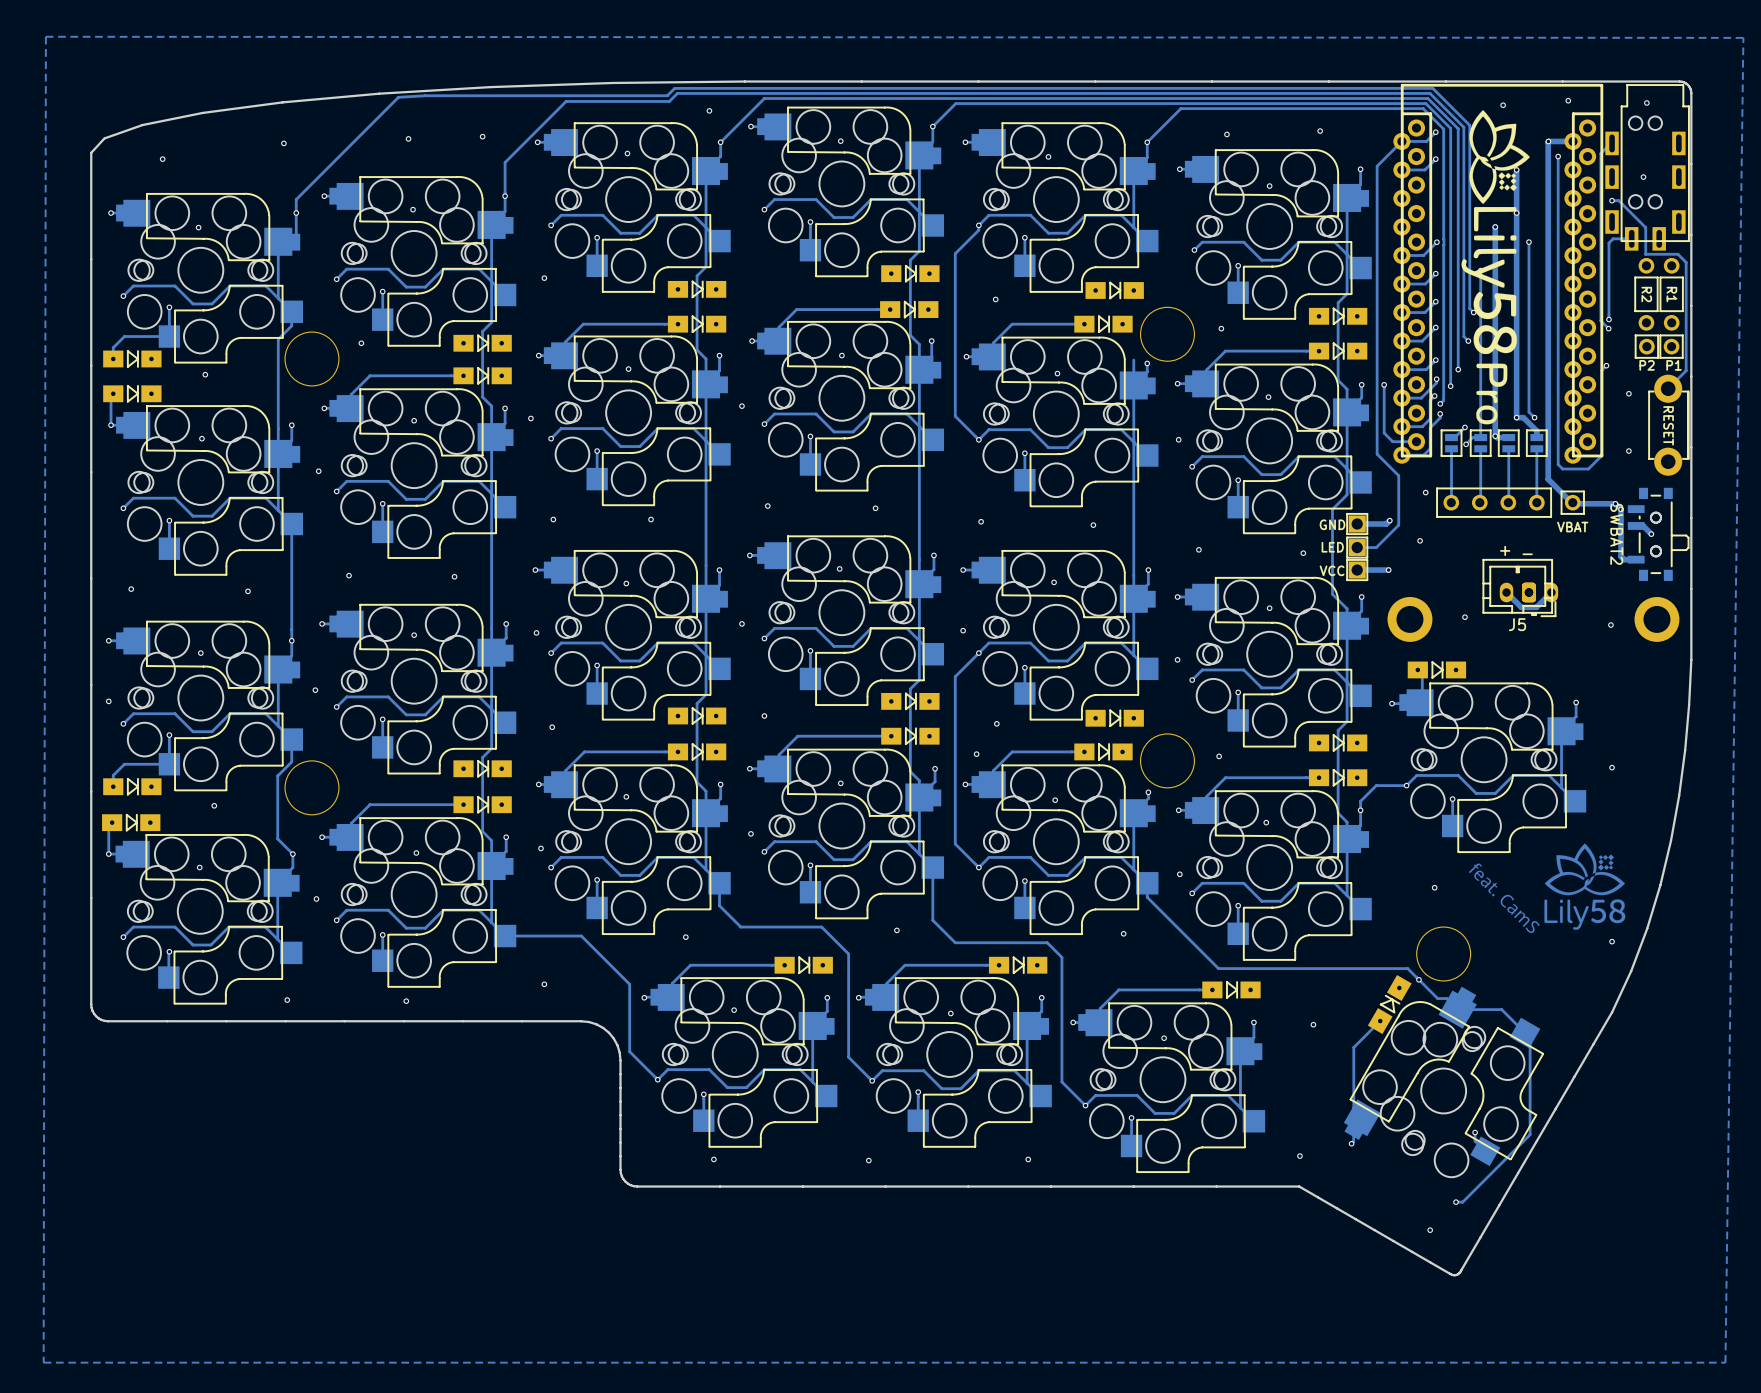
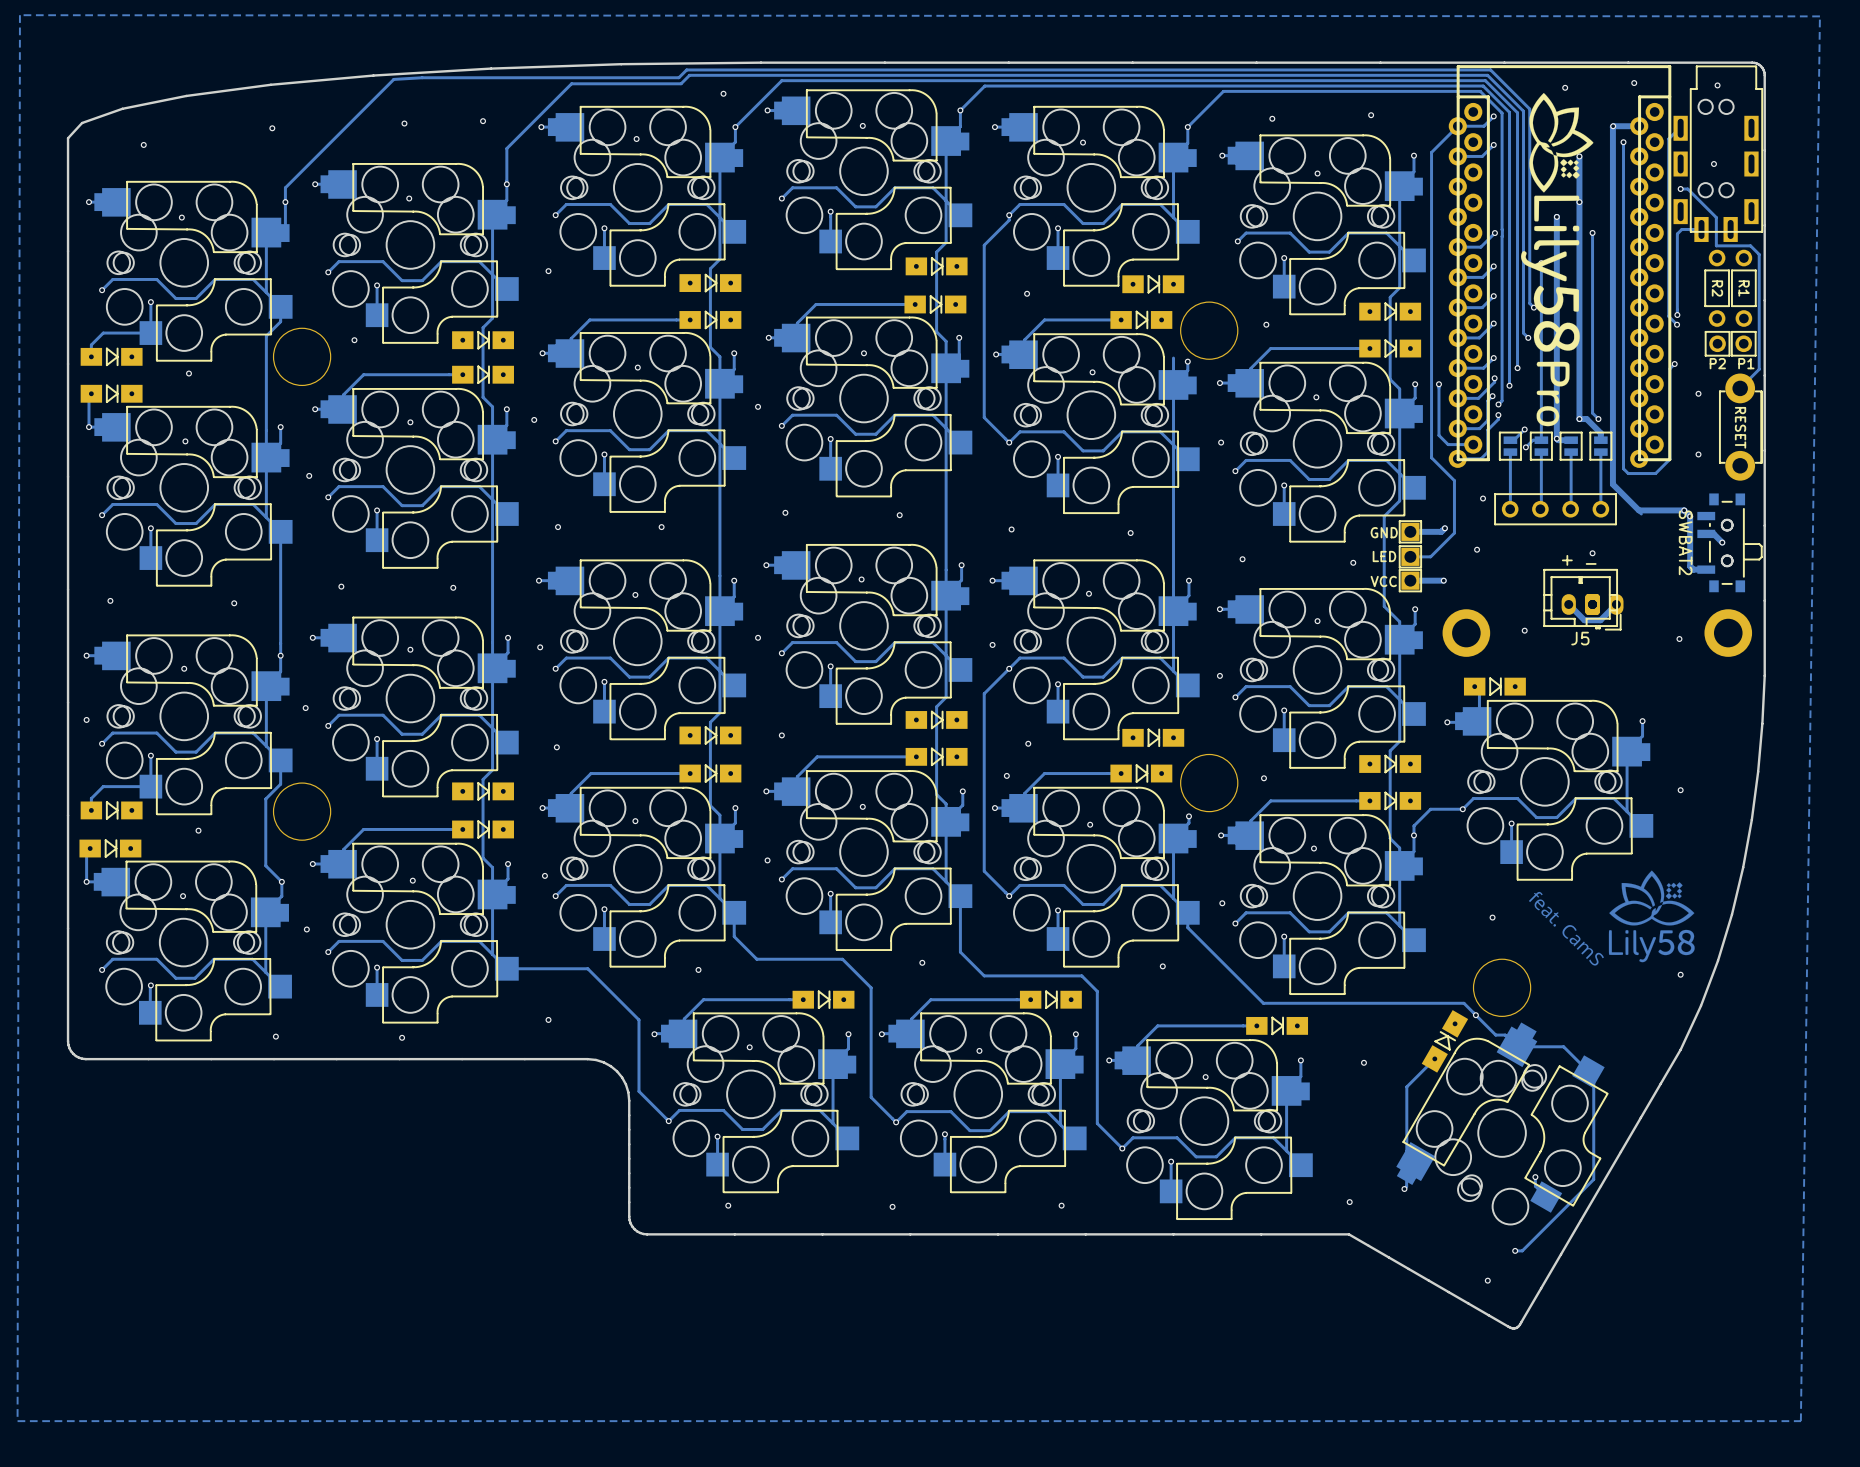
part: (1572, 502) -> none
via: none -> (1592, 553)

